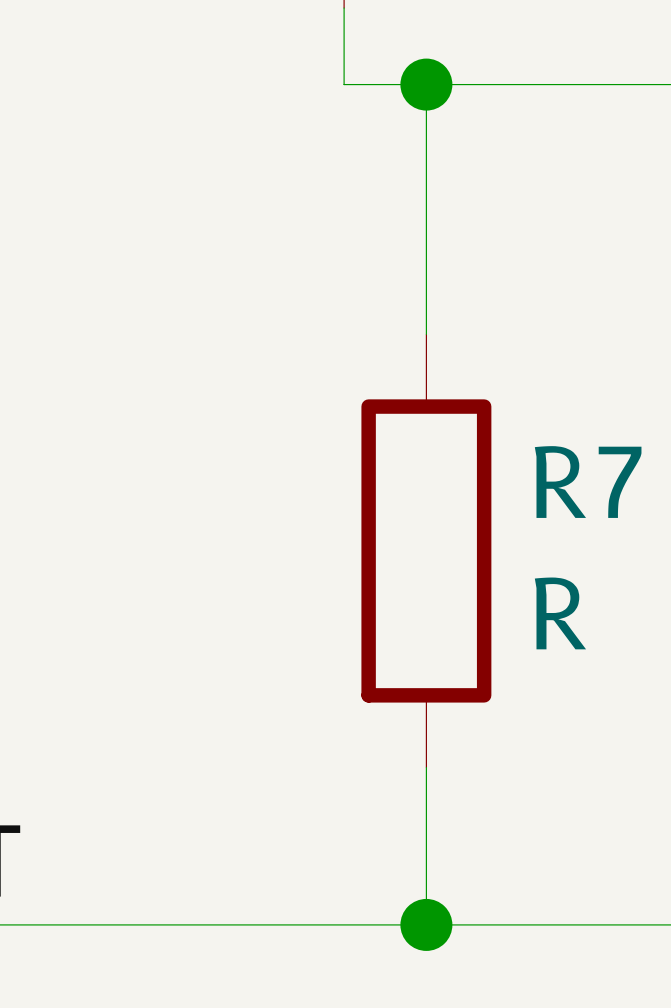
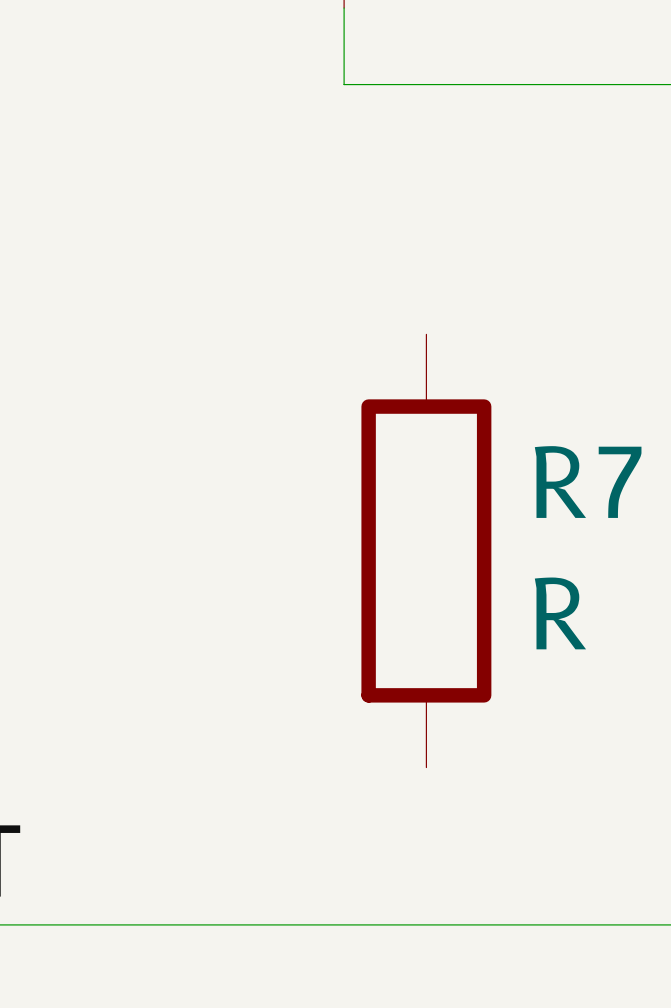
wire: (426, 84) (426, 334) -> none
junction: (426, 84) -> none
wire: (426, 767) (426, 924) -> none
junction: (426, 924) -> none

